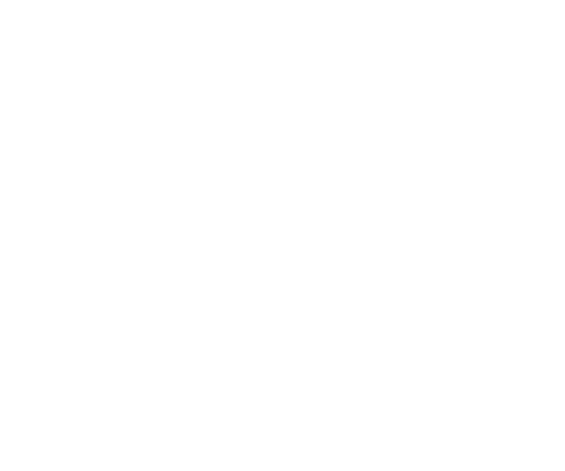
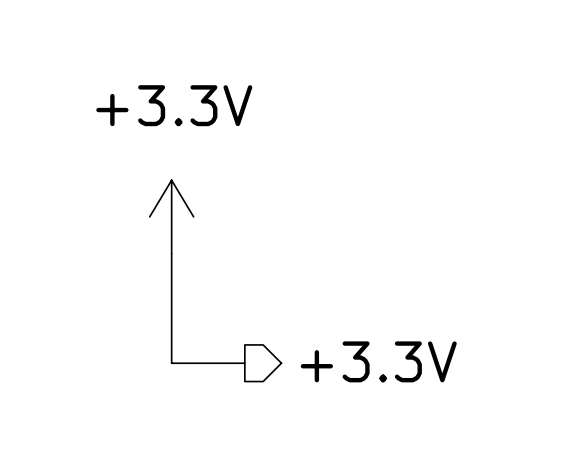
power symbol: none -> +3.3V (171, 216)
wire: none -> (171, 253) (171, 363) (244, 363)
hierarchical label: none -> +3.3V (378, 361)

